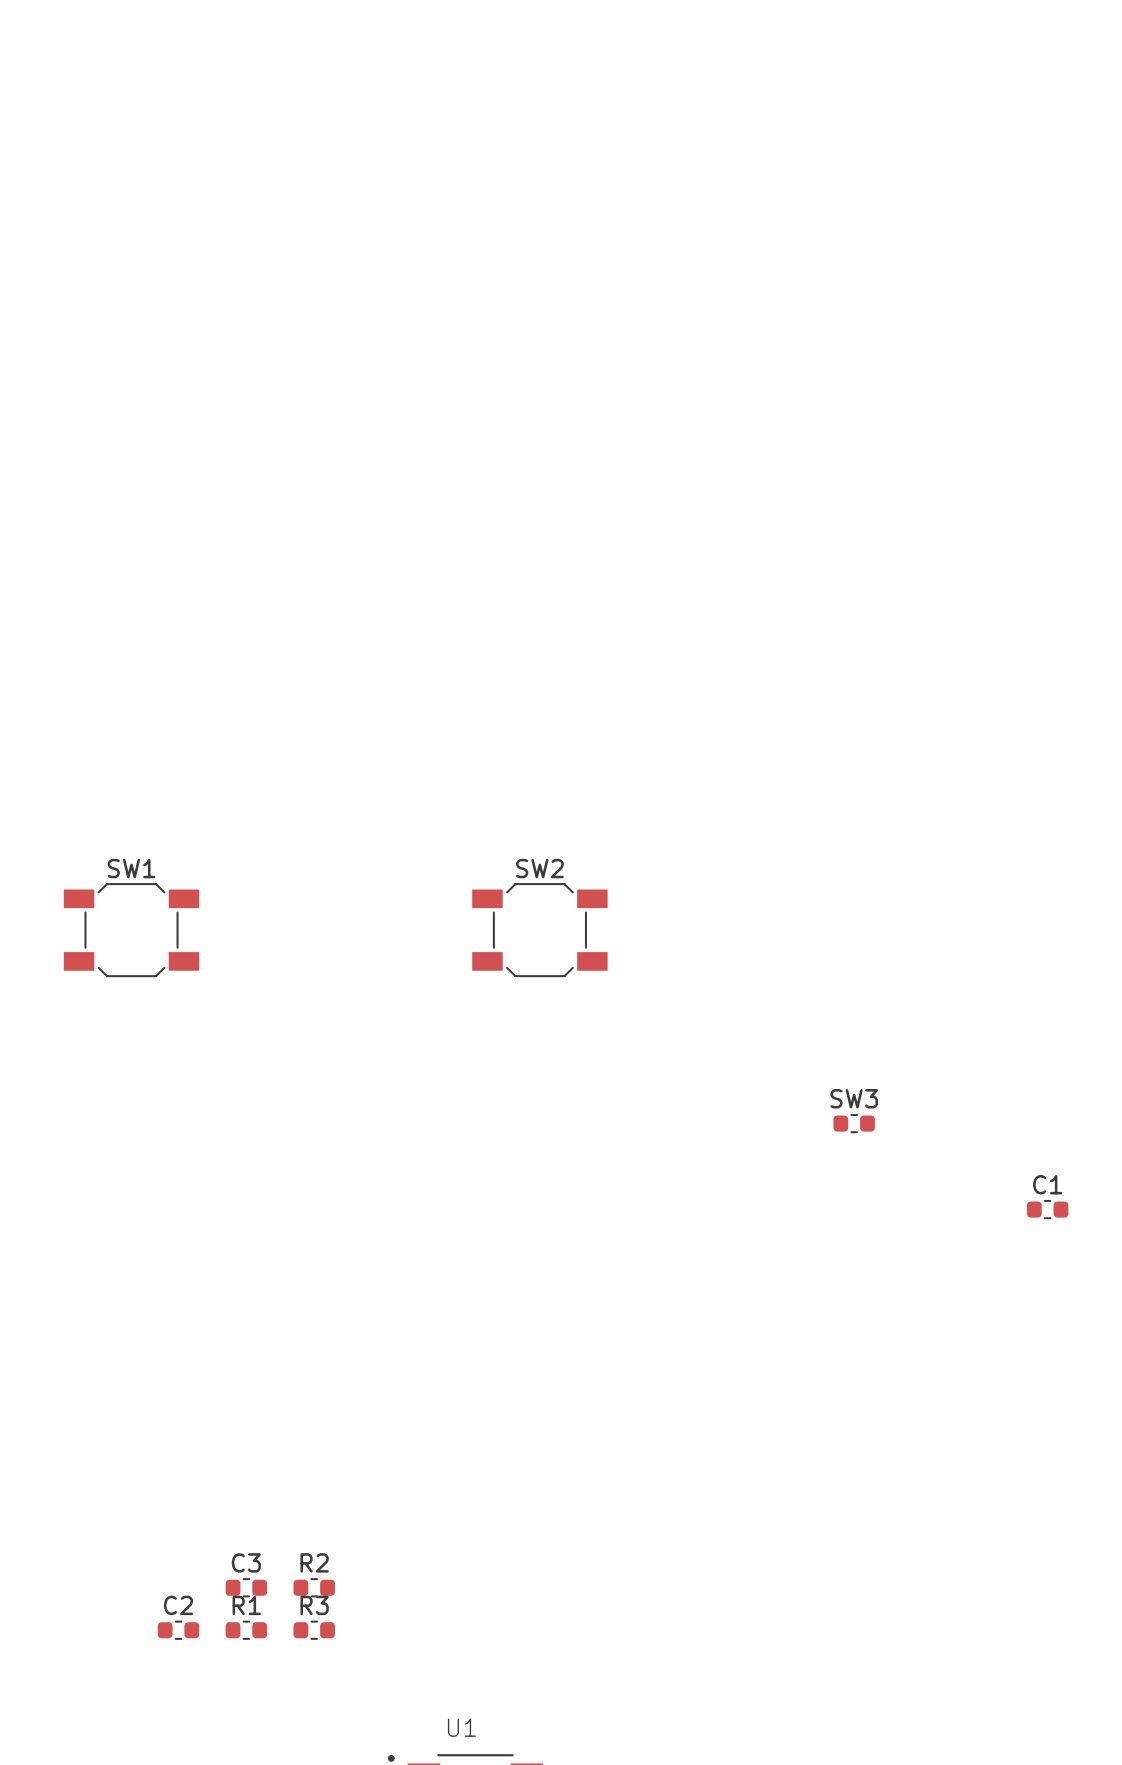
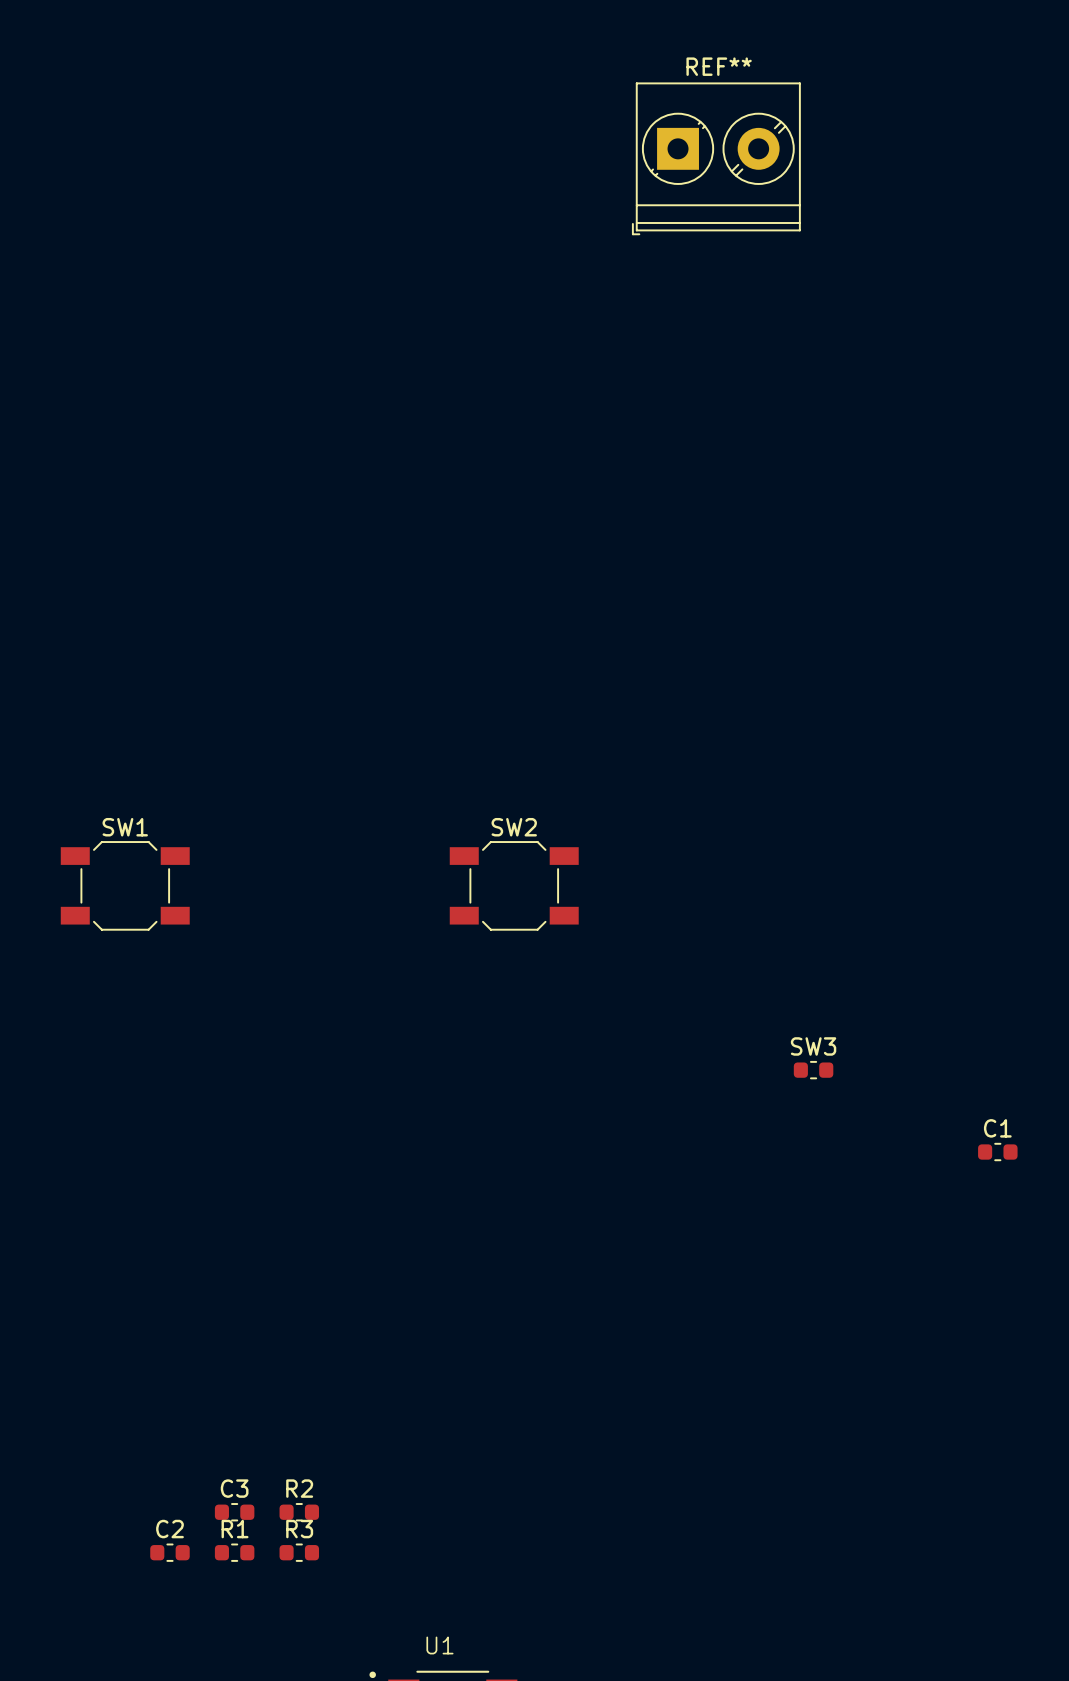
REF**: none -> (716, 158)

